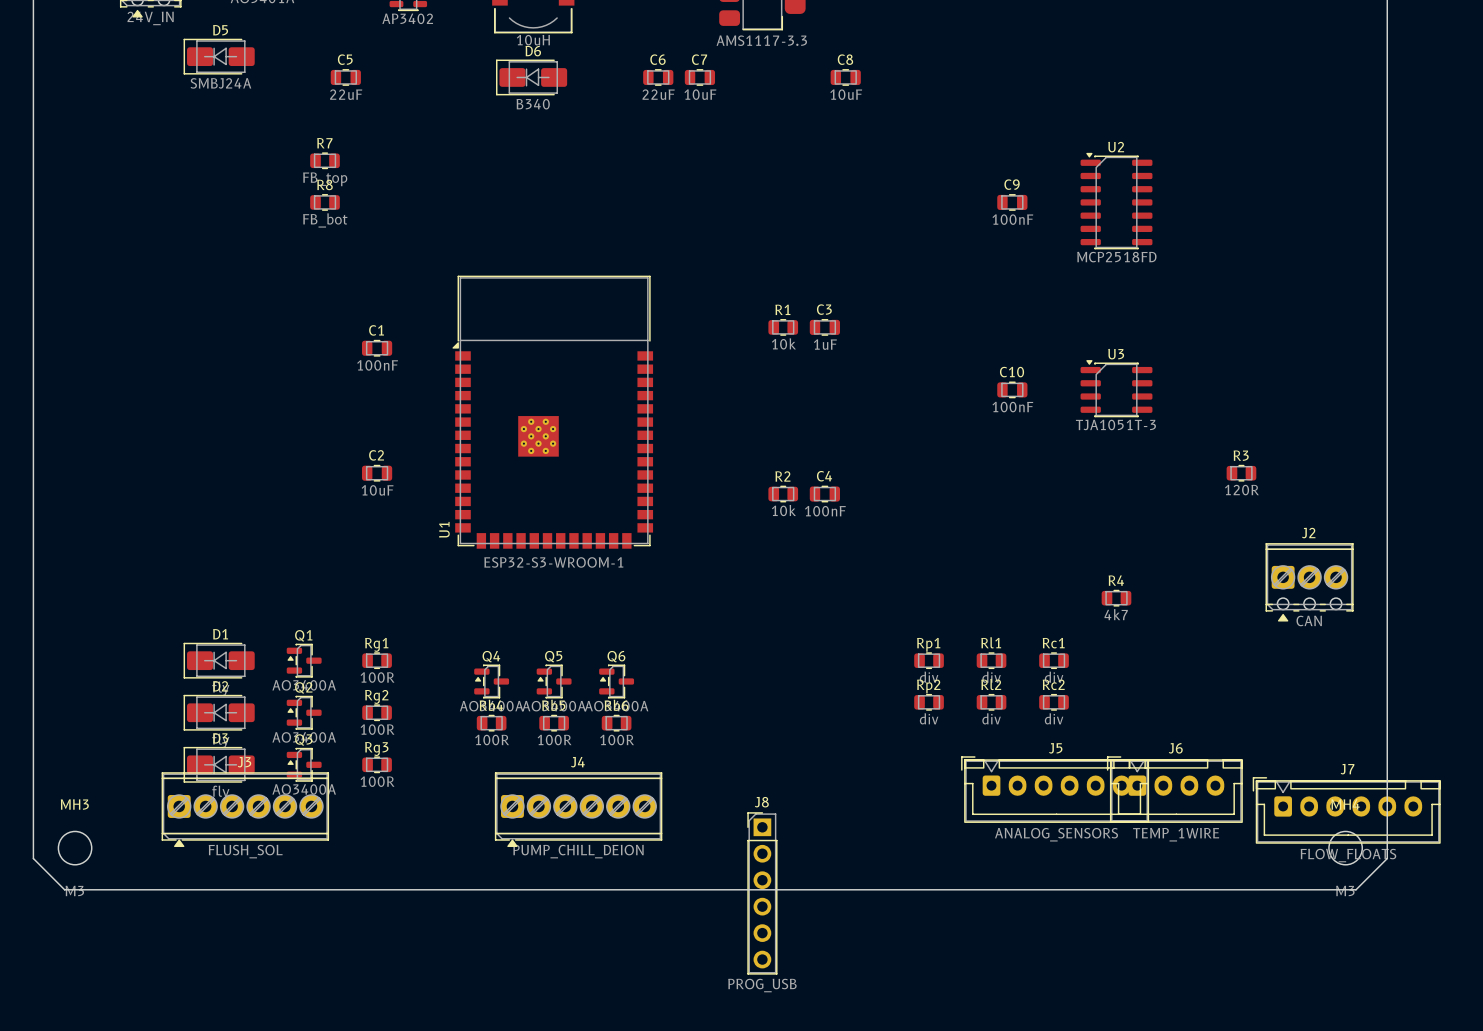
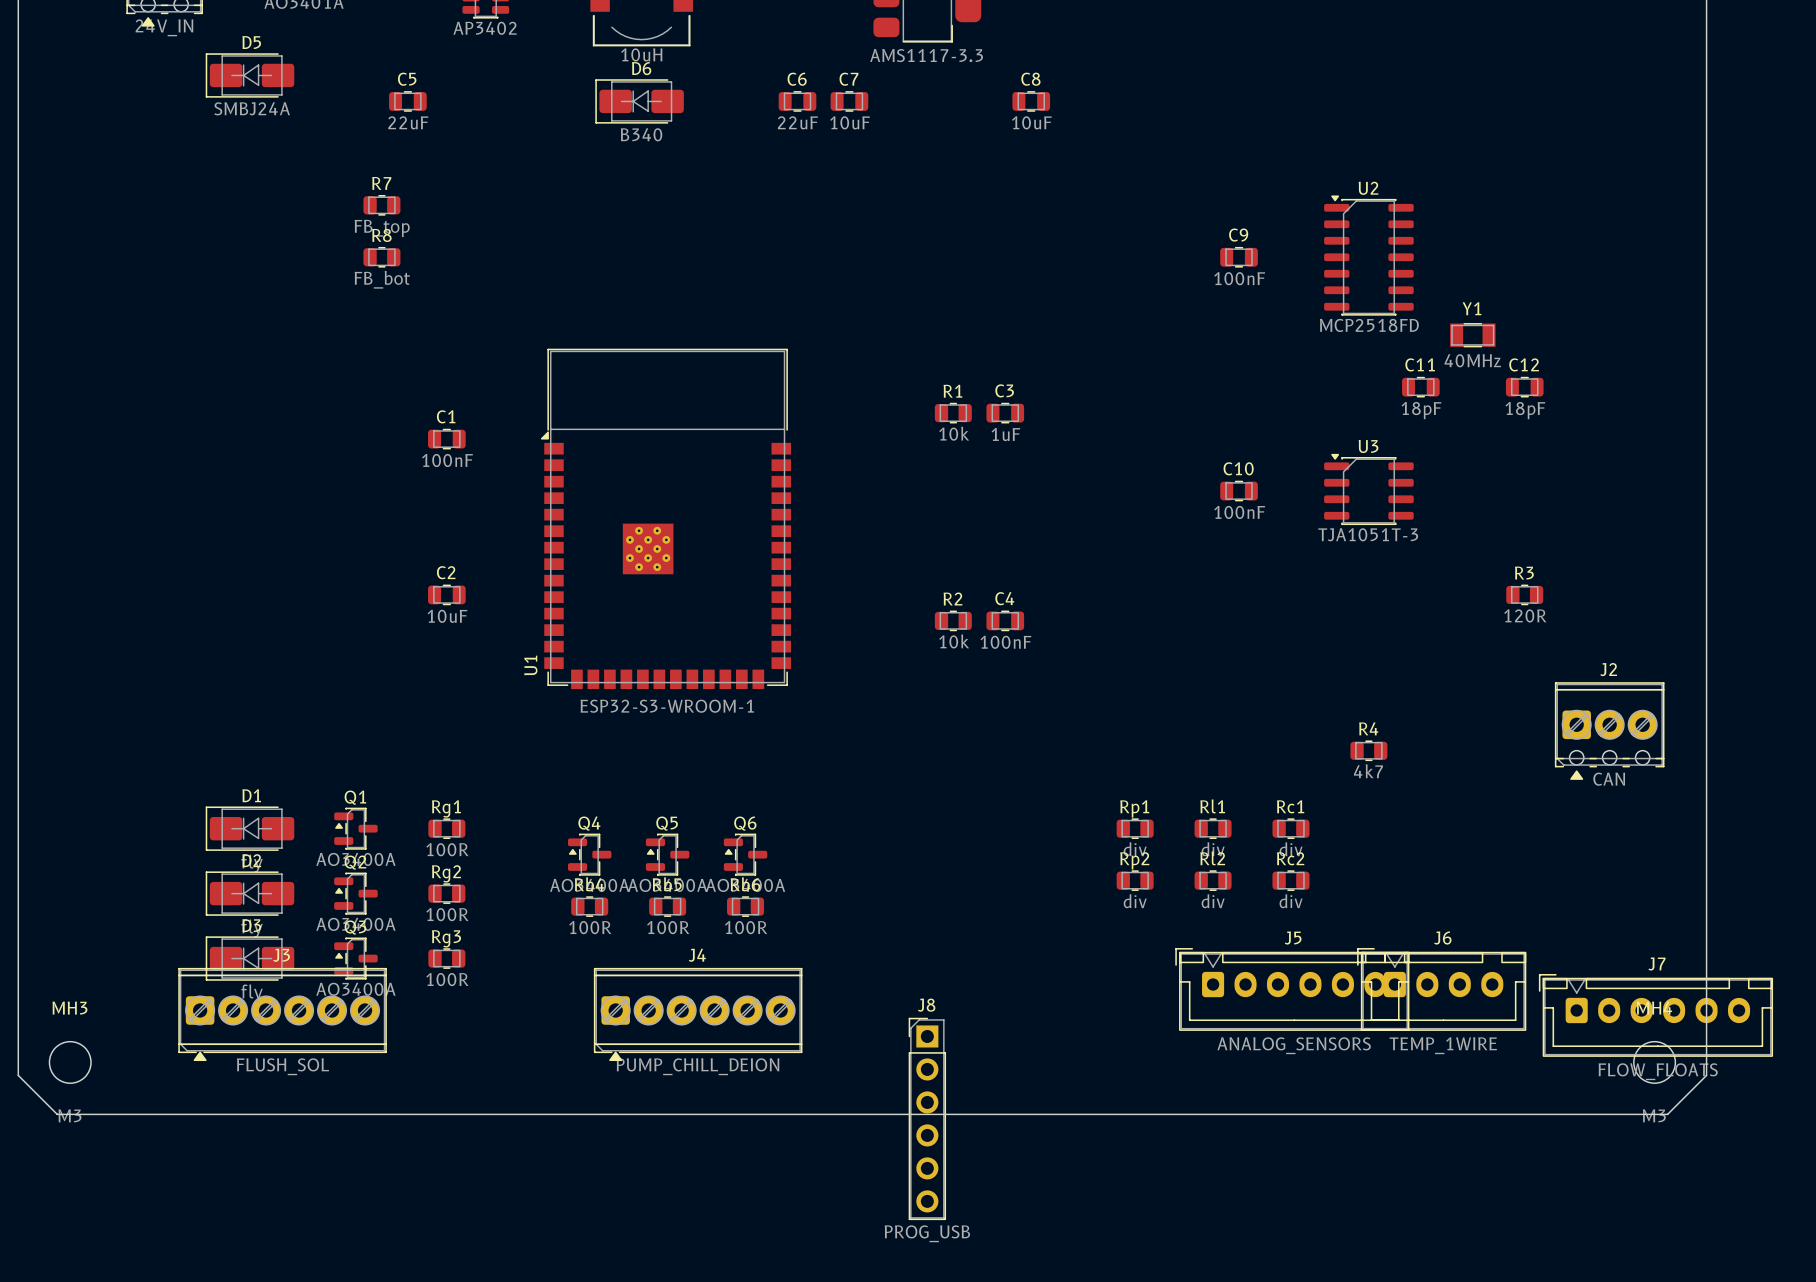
Y1: none -> 40MHz (1472, 335)
C11: none -> 18pF (1420, 387)
C12: none -> 18pF (1524, 387)

